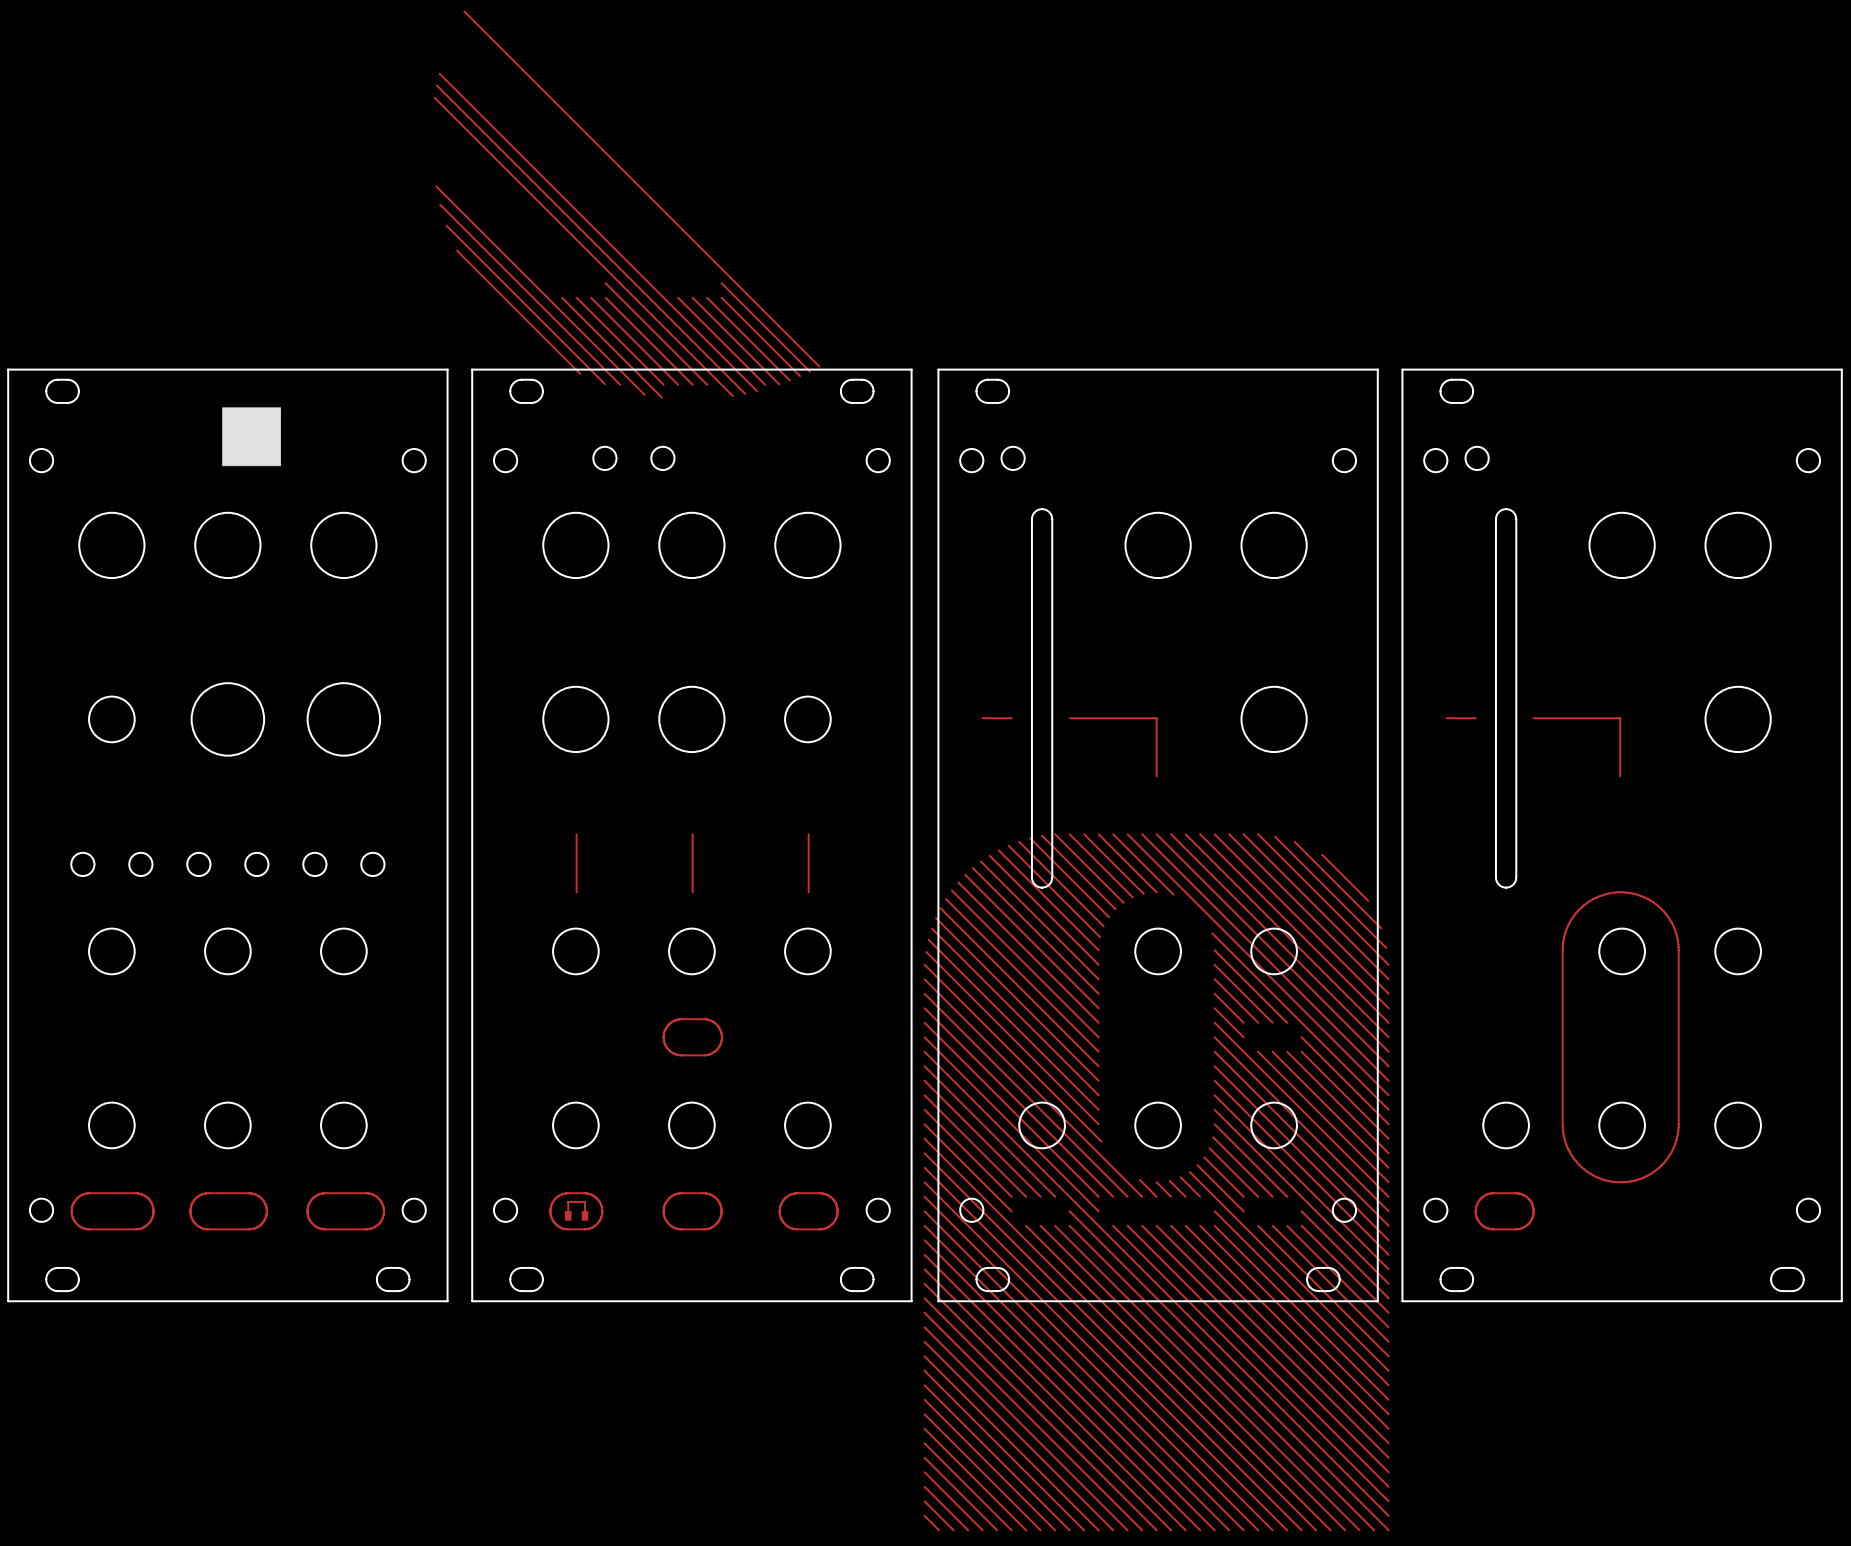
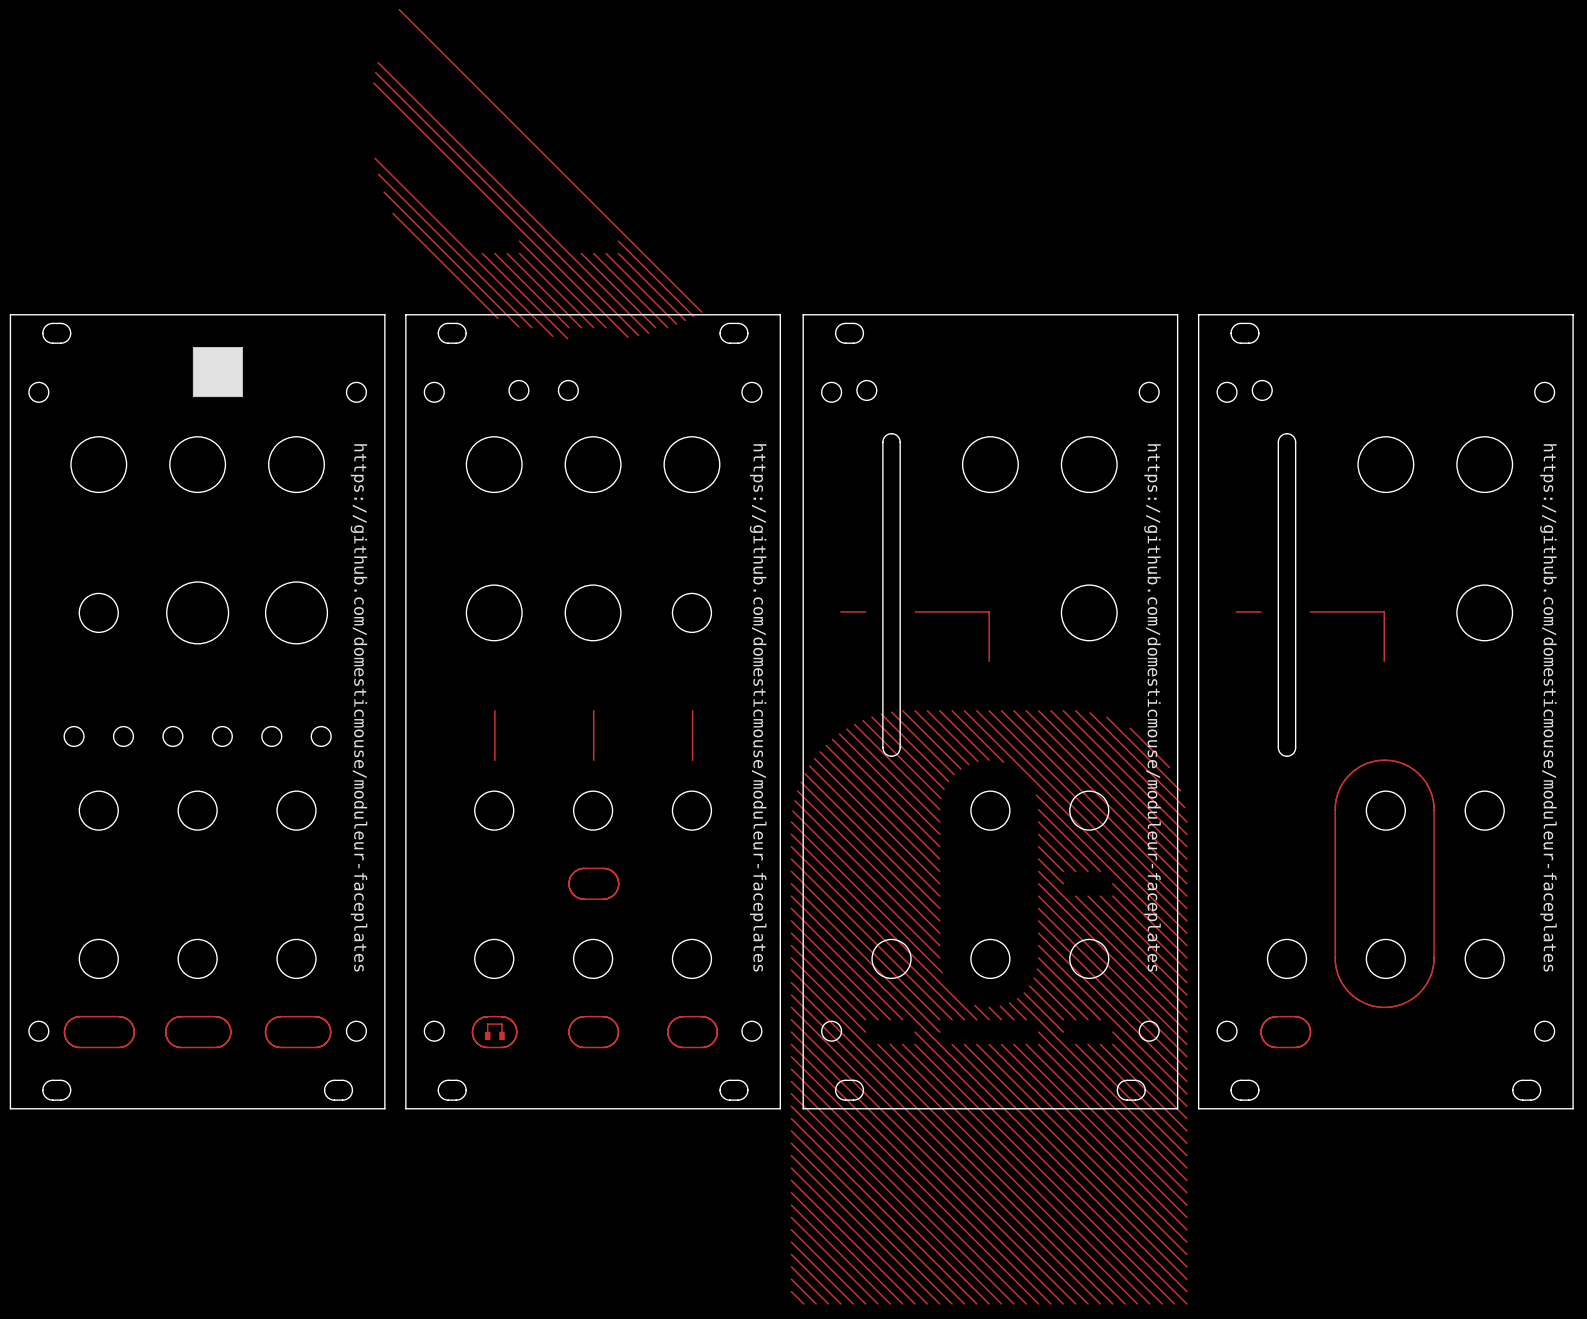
text: none -> https://github.com/domesticmouse/moduleur-faceplates (358, 707)
text: none -> https://github.com/domesticmouse/moduleur-faceplates (758, 707)
text: none -> https://github.com/domesticmouse/moduleur-faceplates (1152, 707)
text: none -> https://github.com/domesticmouse/moduleur-faceplates (1548, 707)

